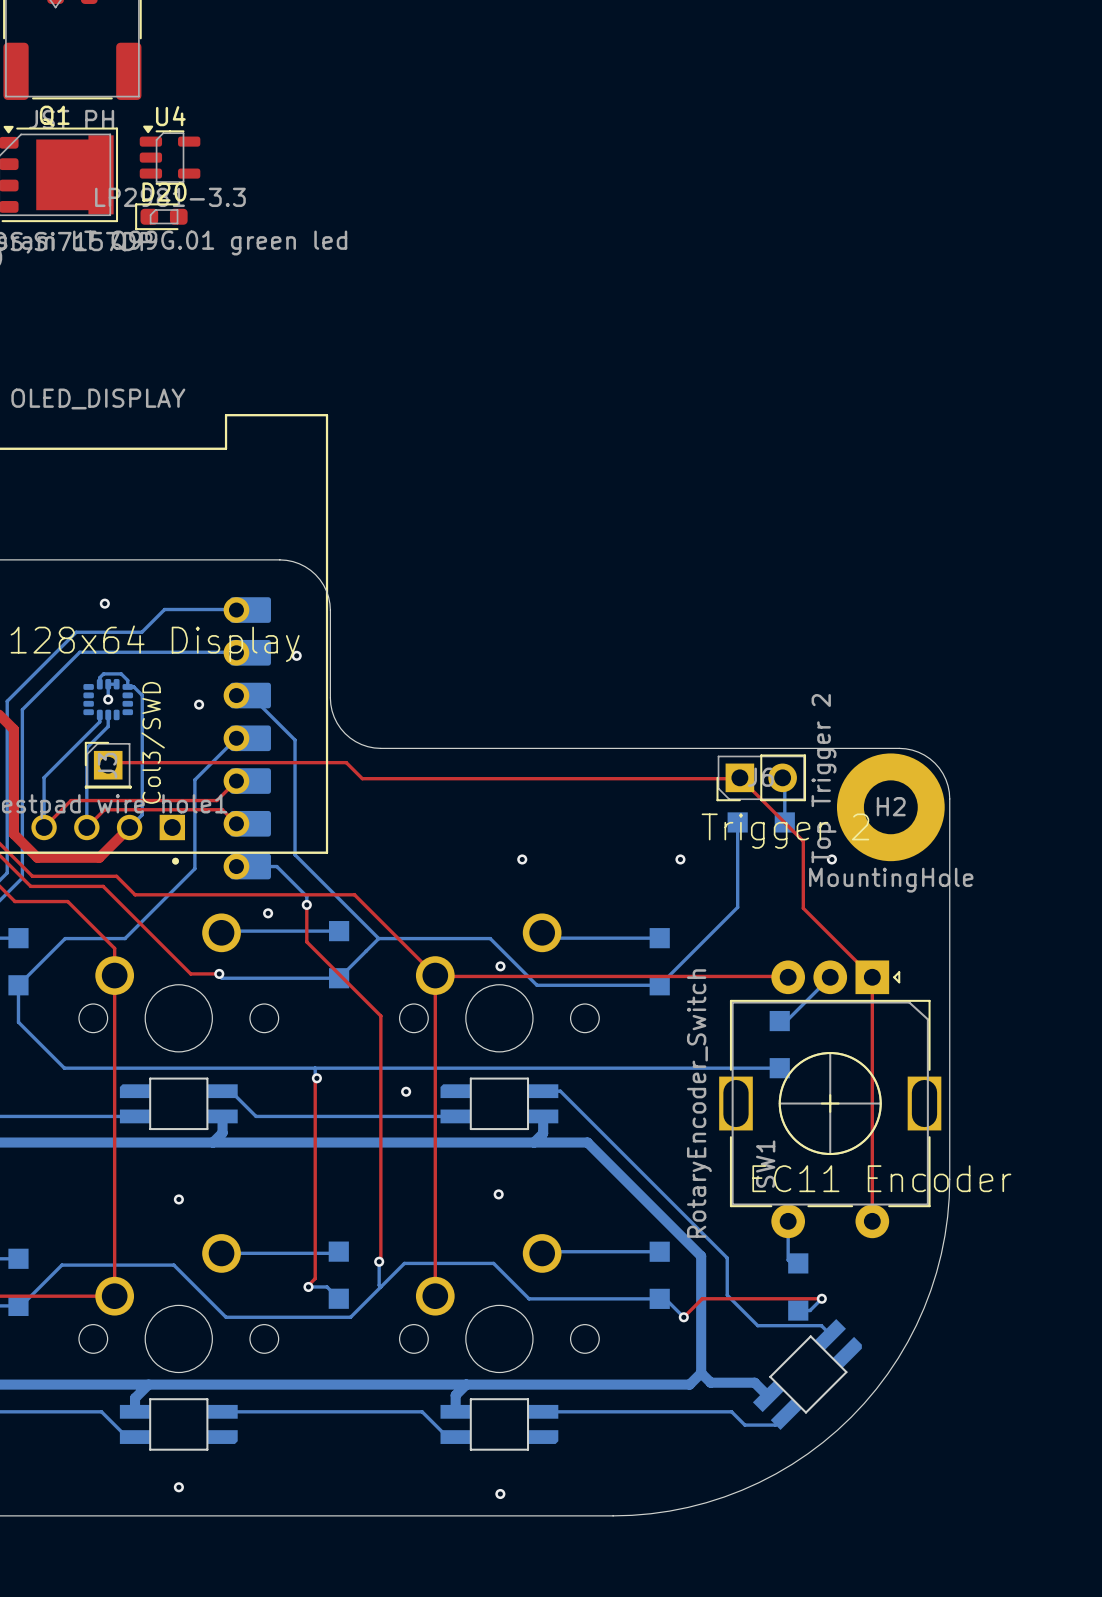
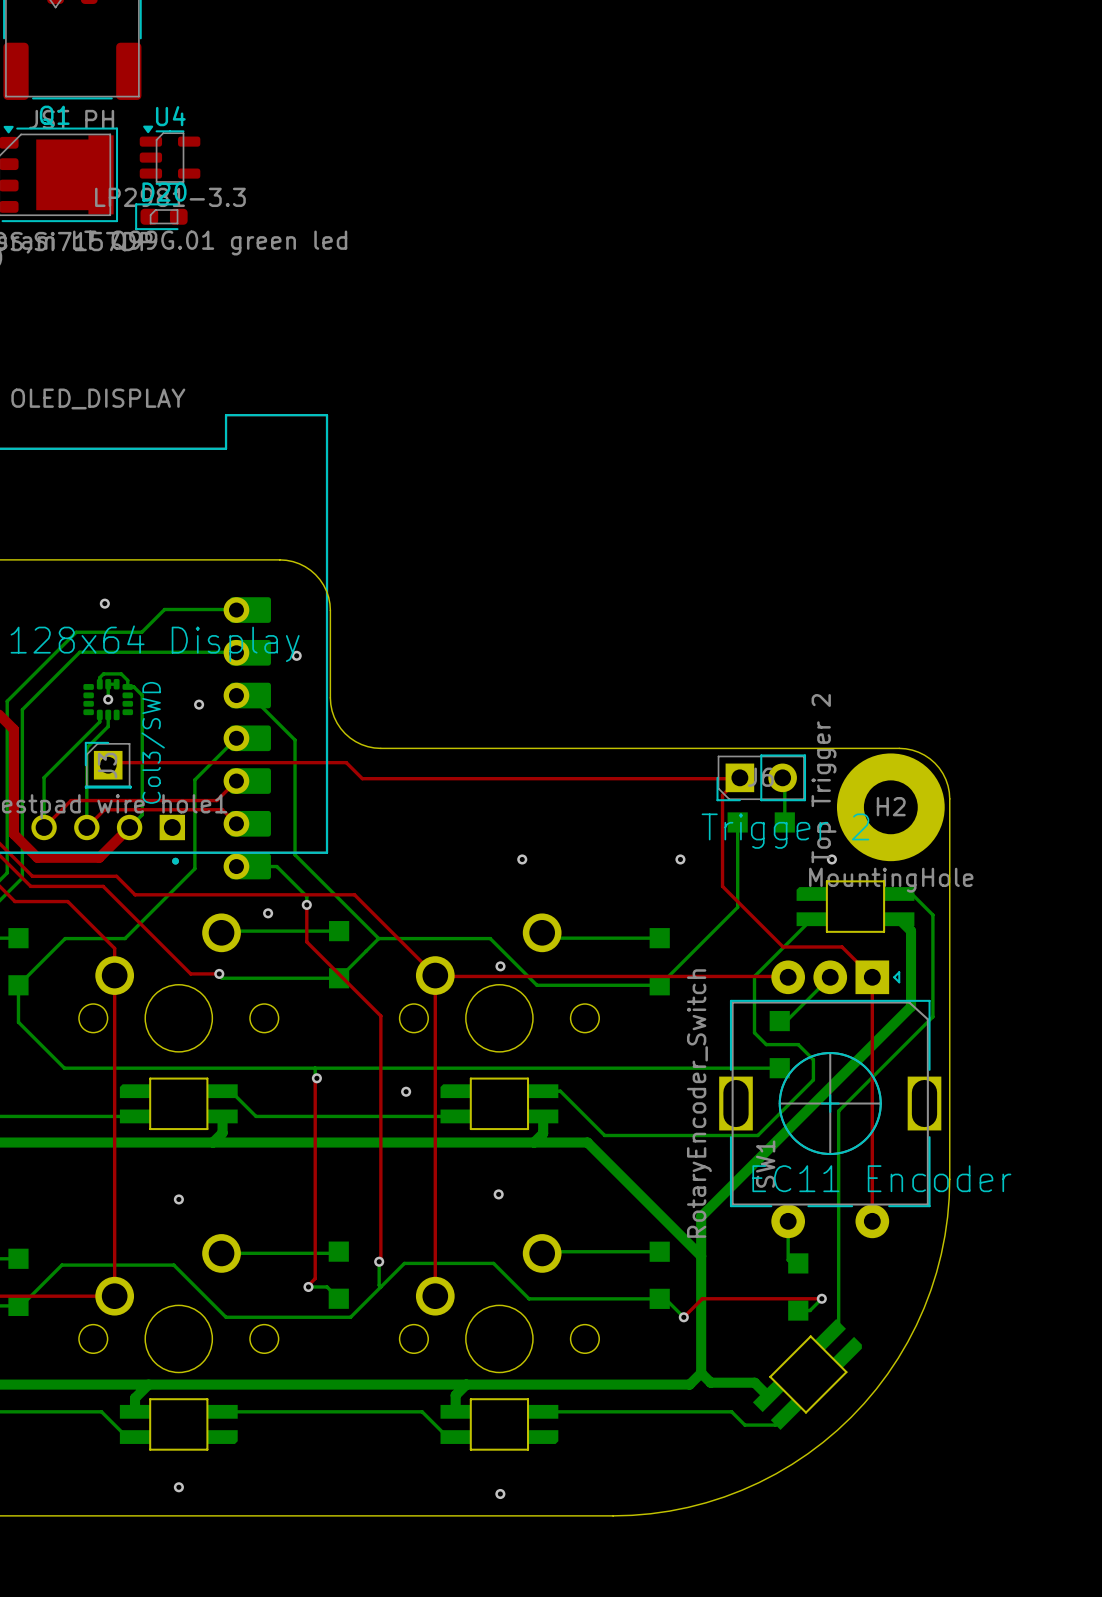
top track: (739, 777) (803, 841) (803, 908) (842, 946) -> (739, 778) (722, 795) (722, 886) (783, 946) (842, 946)
part: none -> (855, 906)
bottom track: none -> (811, 919) (754, 976) (754, 1032) (766, 1044) (798, 1044) (813, 1059) (813, 1079) (757, 1135) (604, 1135)
bottom track: none -> (899, 919) (911, 931) (911, 1006) (701, 1216) (701, 1256)
bottom track: (604, 1135) (727, 1258) (727, 1295) (757, 1325) (821, 1325) (830, 1334) -> (899, 893) (911, 893) (932, 915) (932, 1016) (838, 1111) (838, 1326) (830, 1334)

